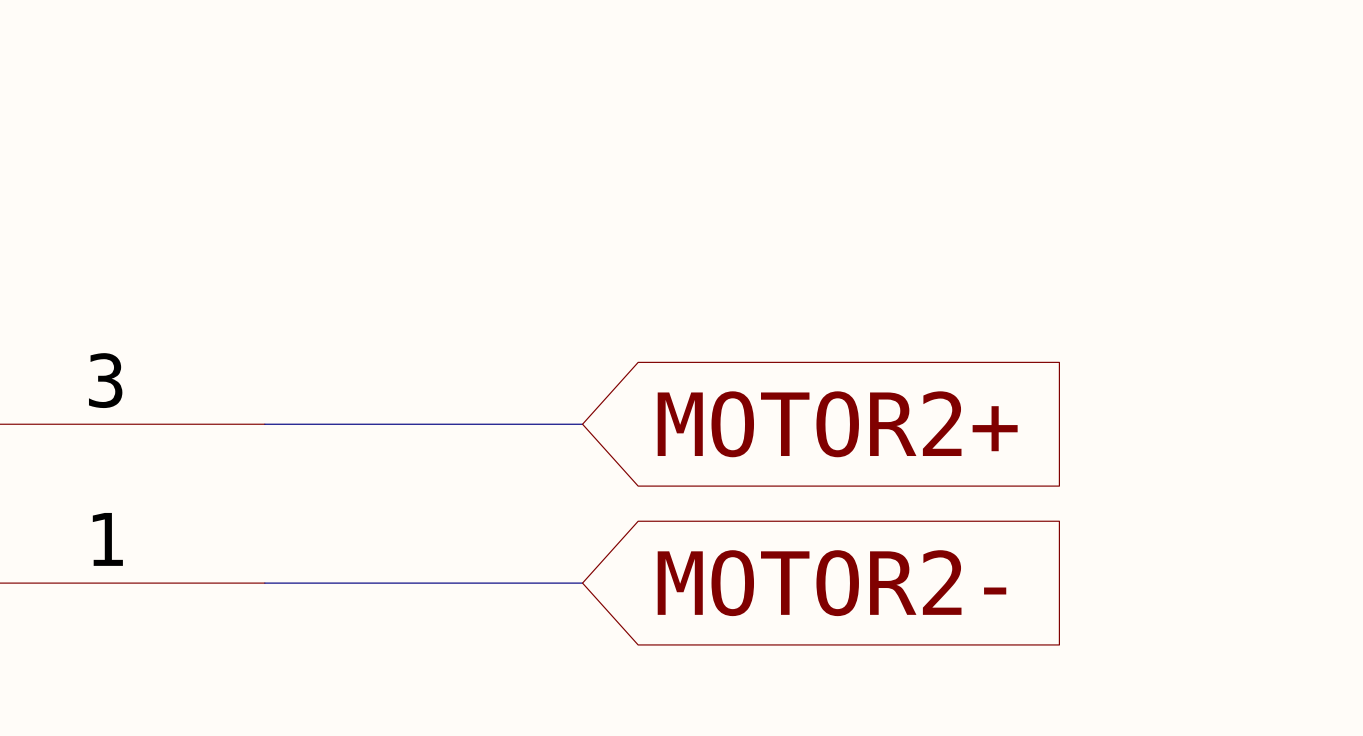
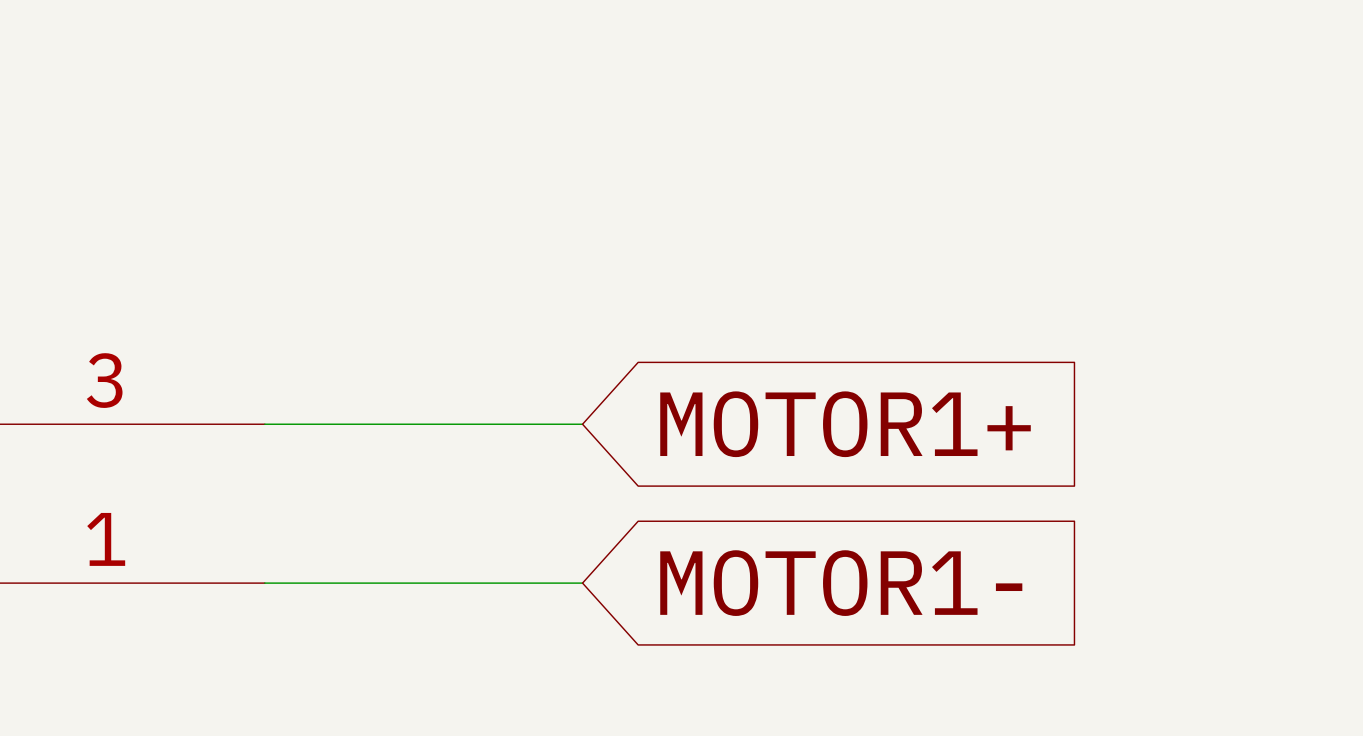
global label: MOTOR2+ (837, 424) -> MOTOR1+ (845, 424)
global label: MOTOR2- (831, 583) -> MOTOR1- (841, 583)

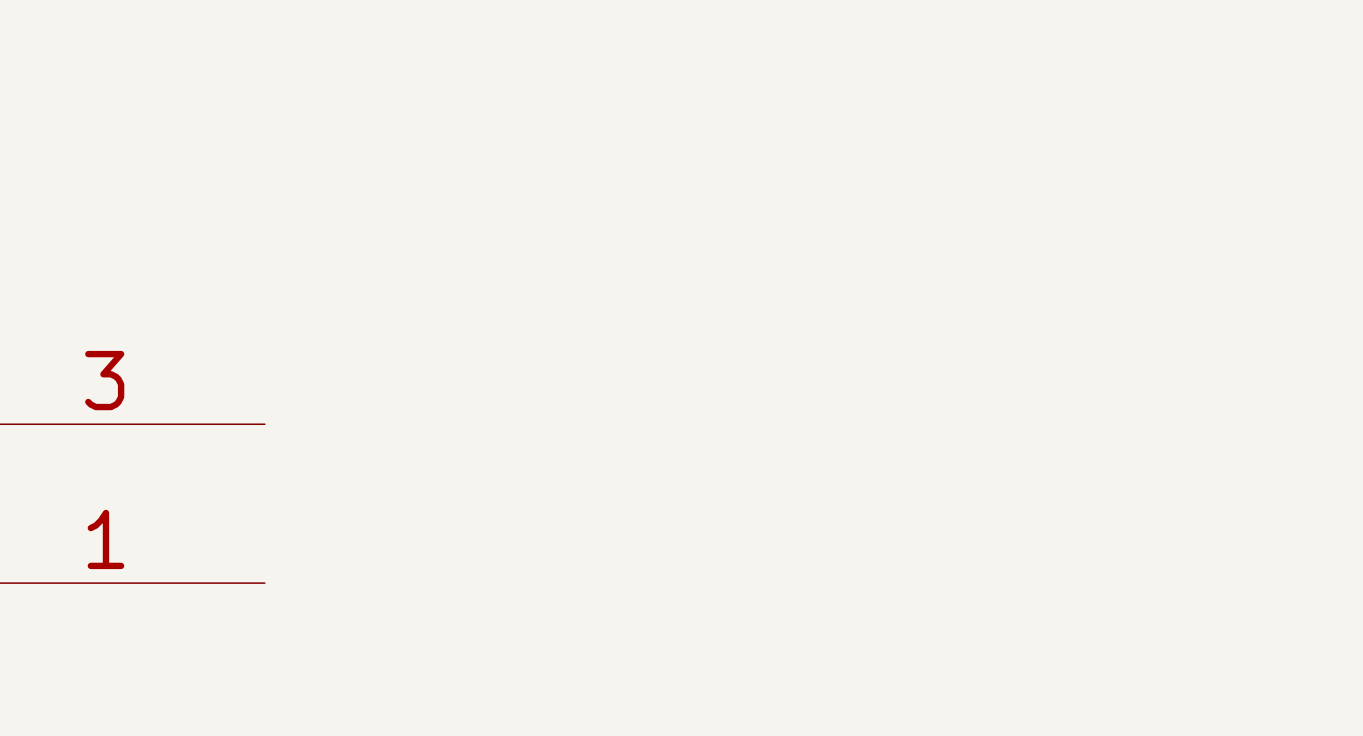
wire: (264, 424) (582, 424) -> none
global label: MOTOR1+ (845, 424) -> none
wire: (264, 583) (582, 583) -> none
global label: MOTOR1- (841, 583) -> none

